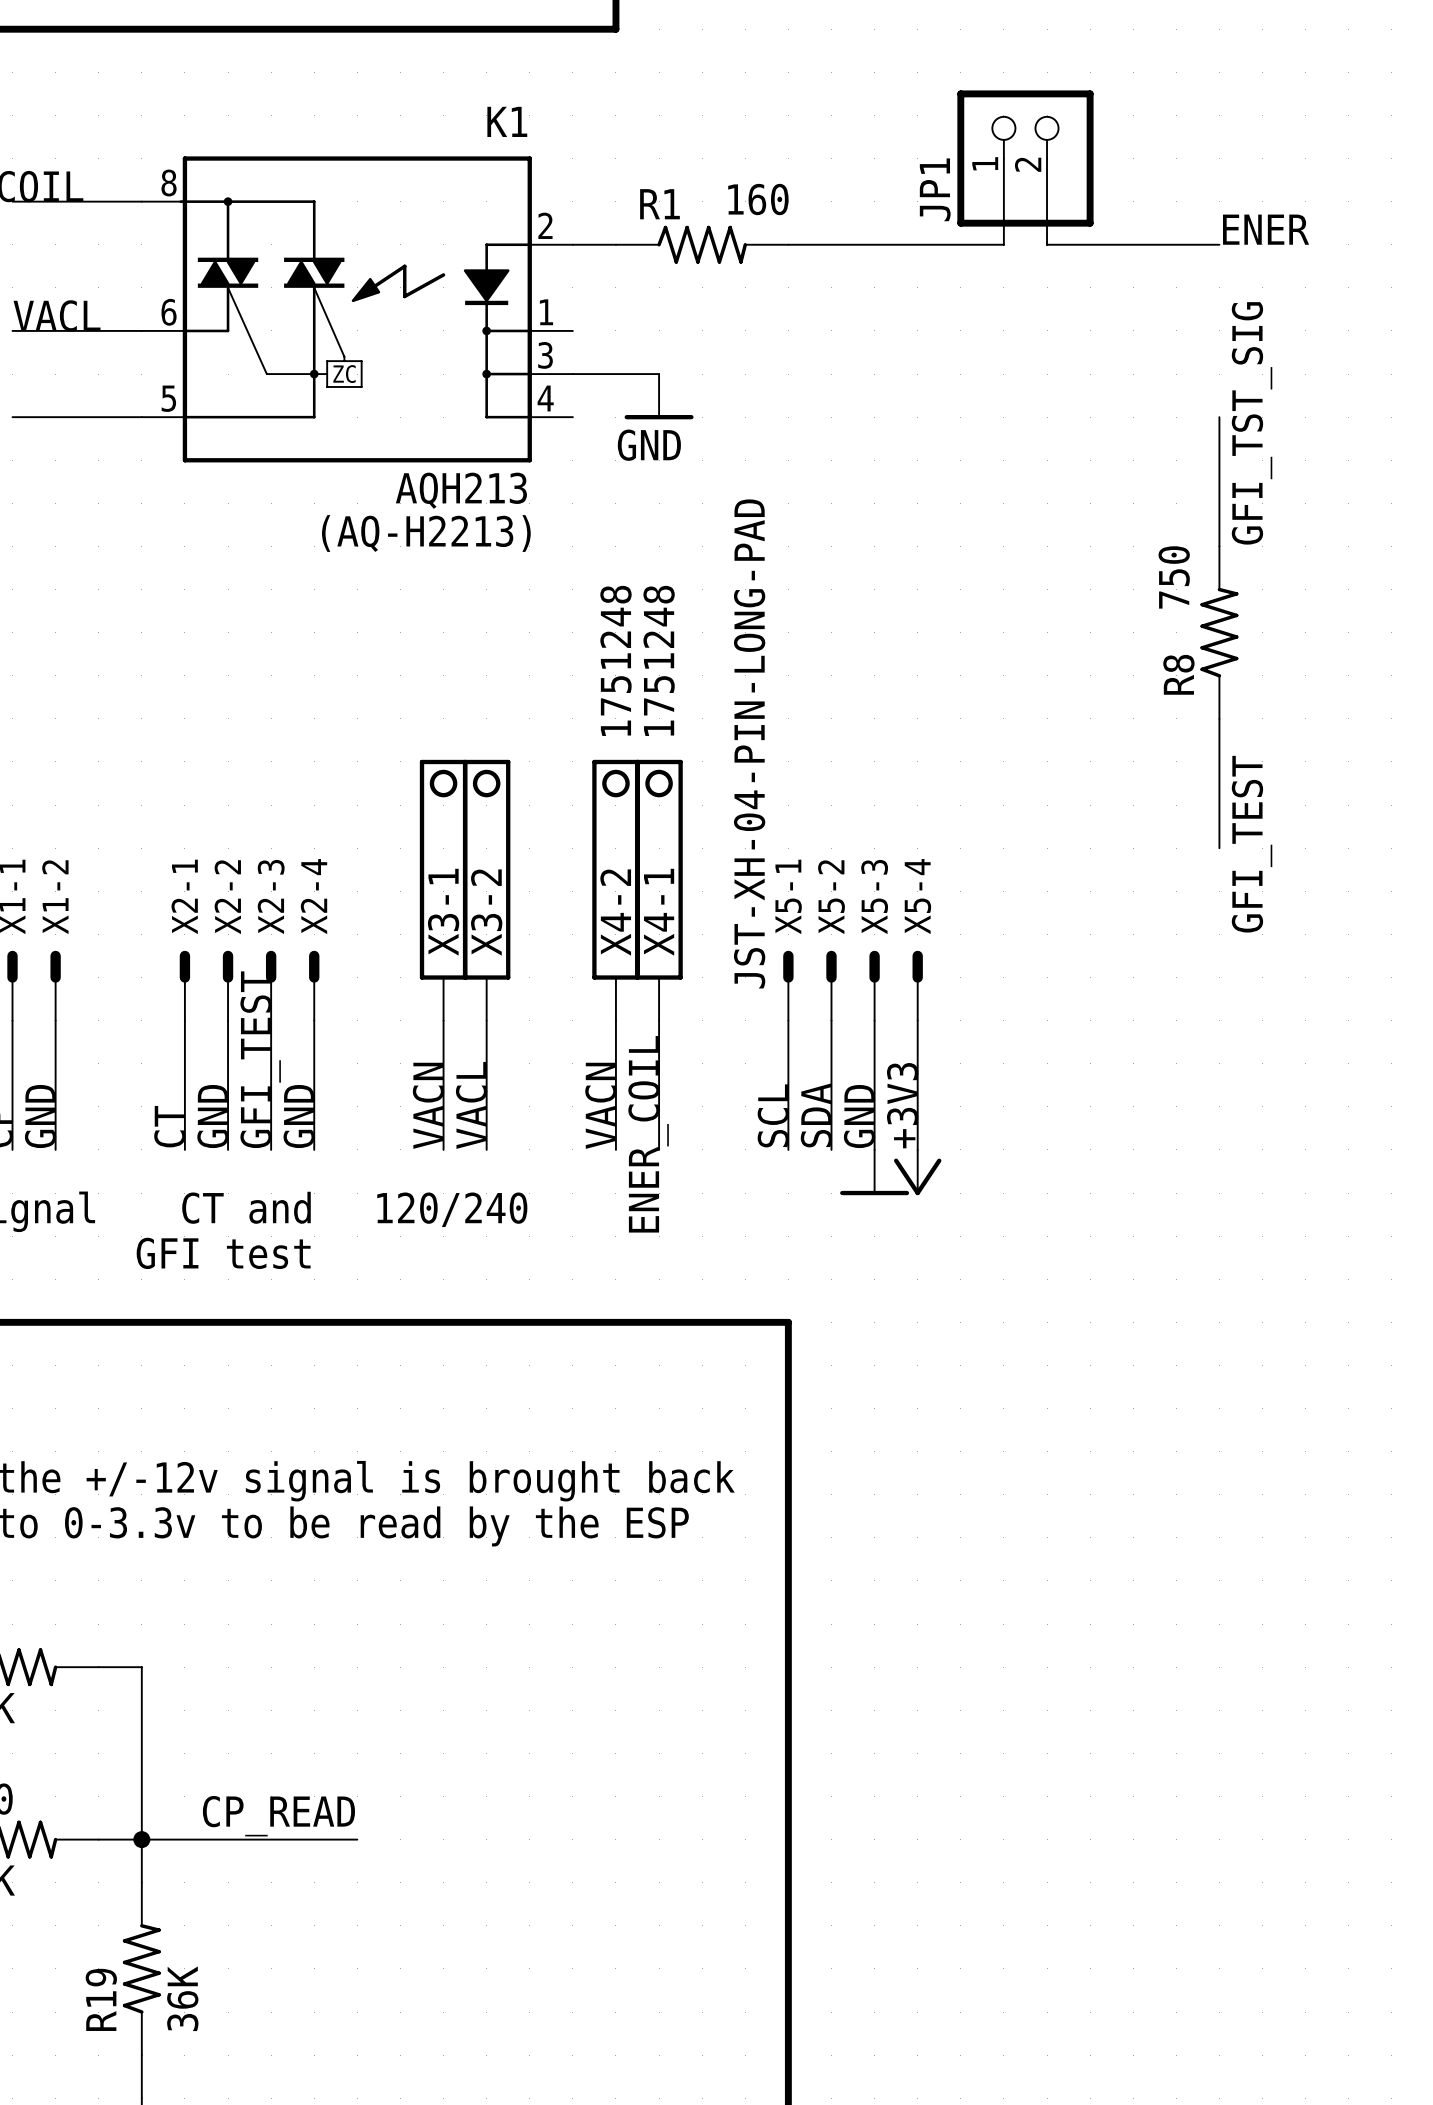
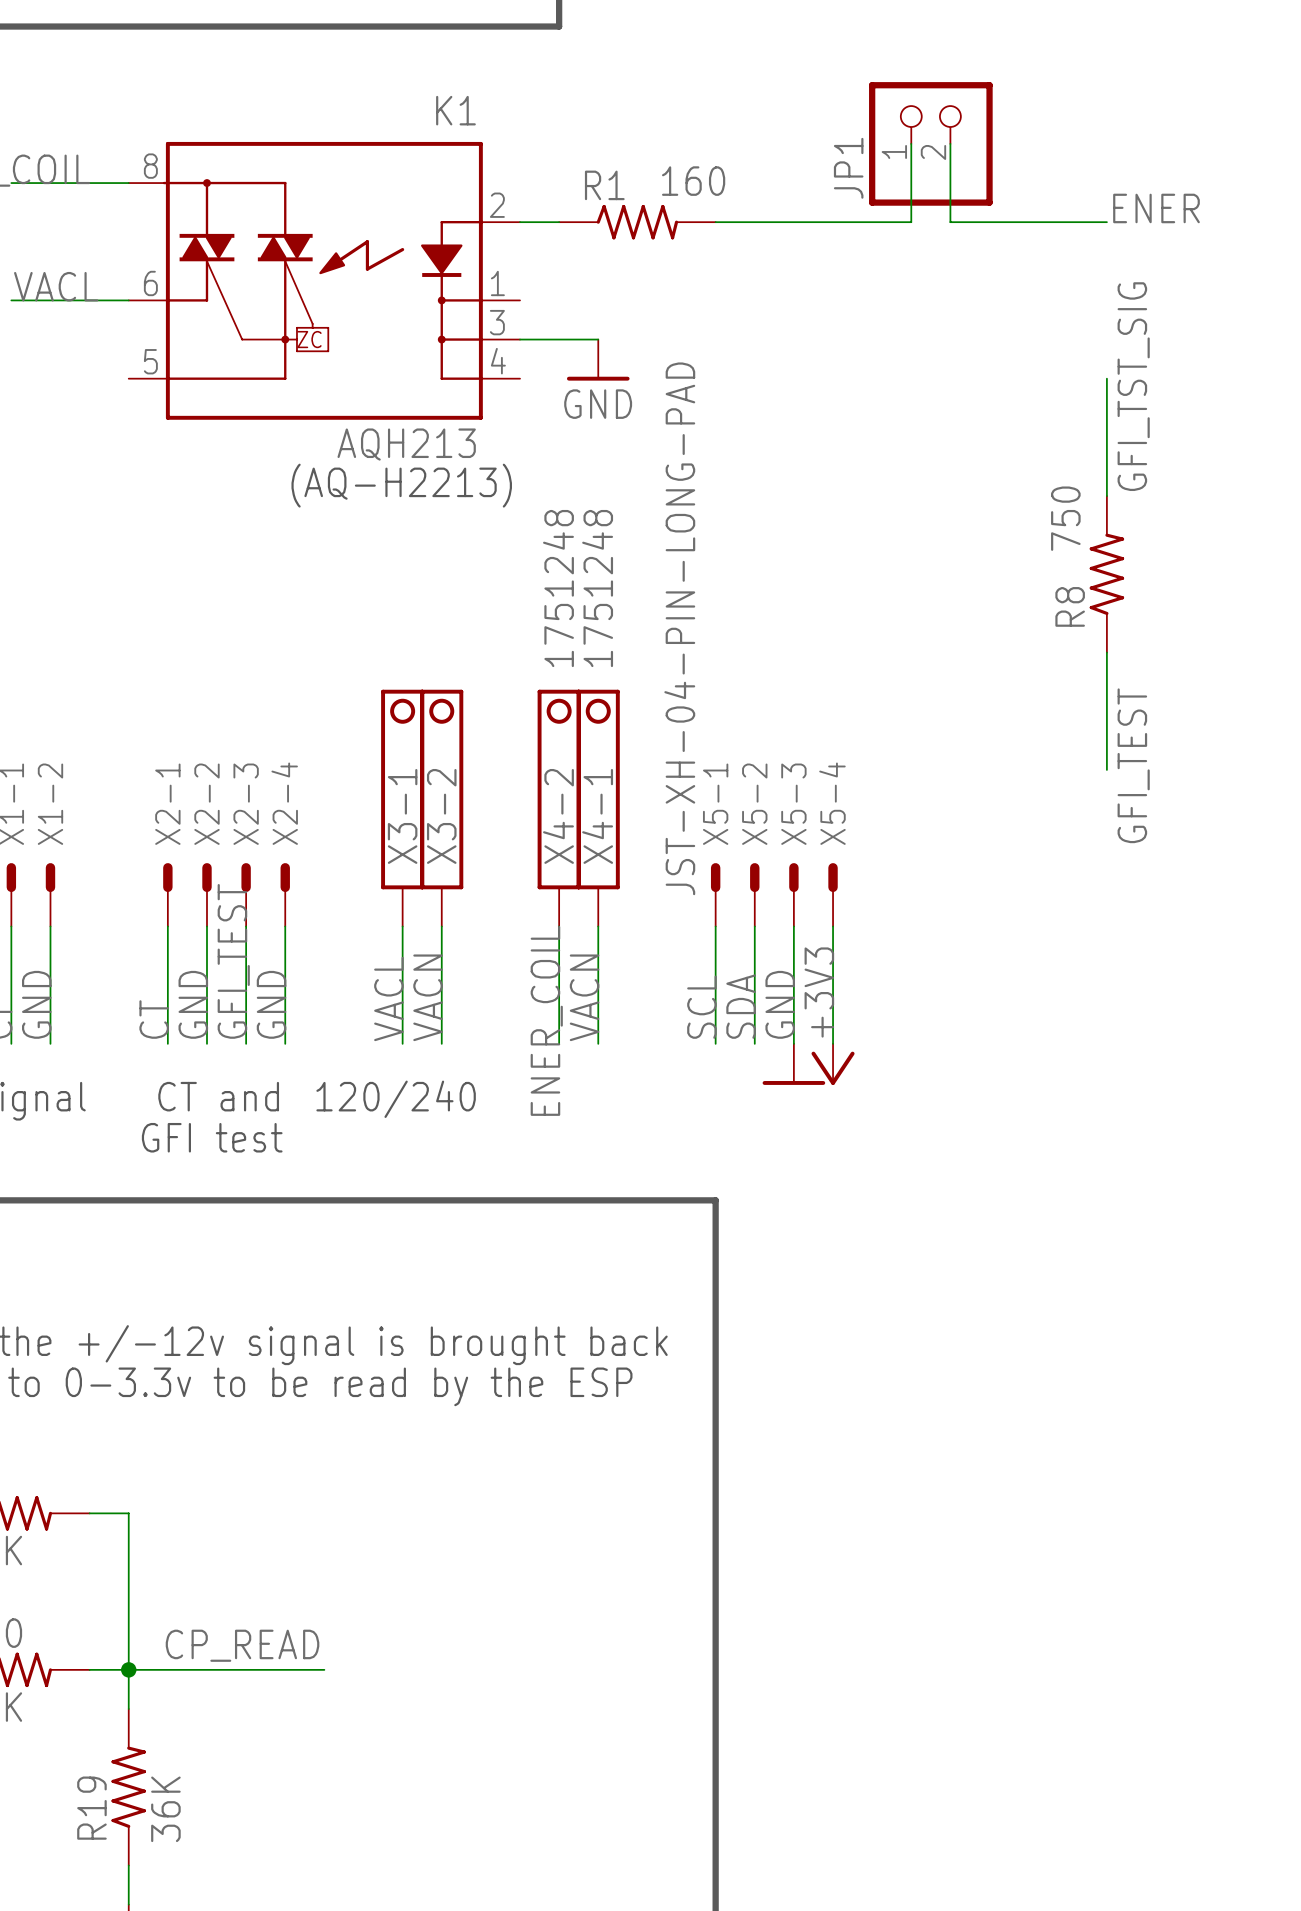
wire: (12, 417) (141, 417) -> none
label: VACN (428, 1105) -> VACL (388, 998)
label: VACL (471, 1105) -> VACN (428, 997)
label position: VACN (600, 1105) -> VACN (584, 997)
label position: ENER_COIL (648, 1134) -> ENER_COIL (546, 1020)

